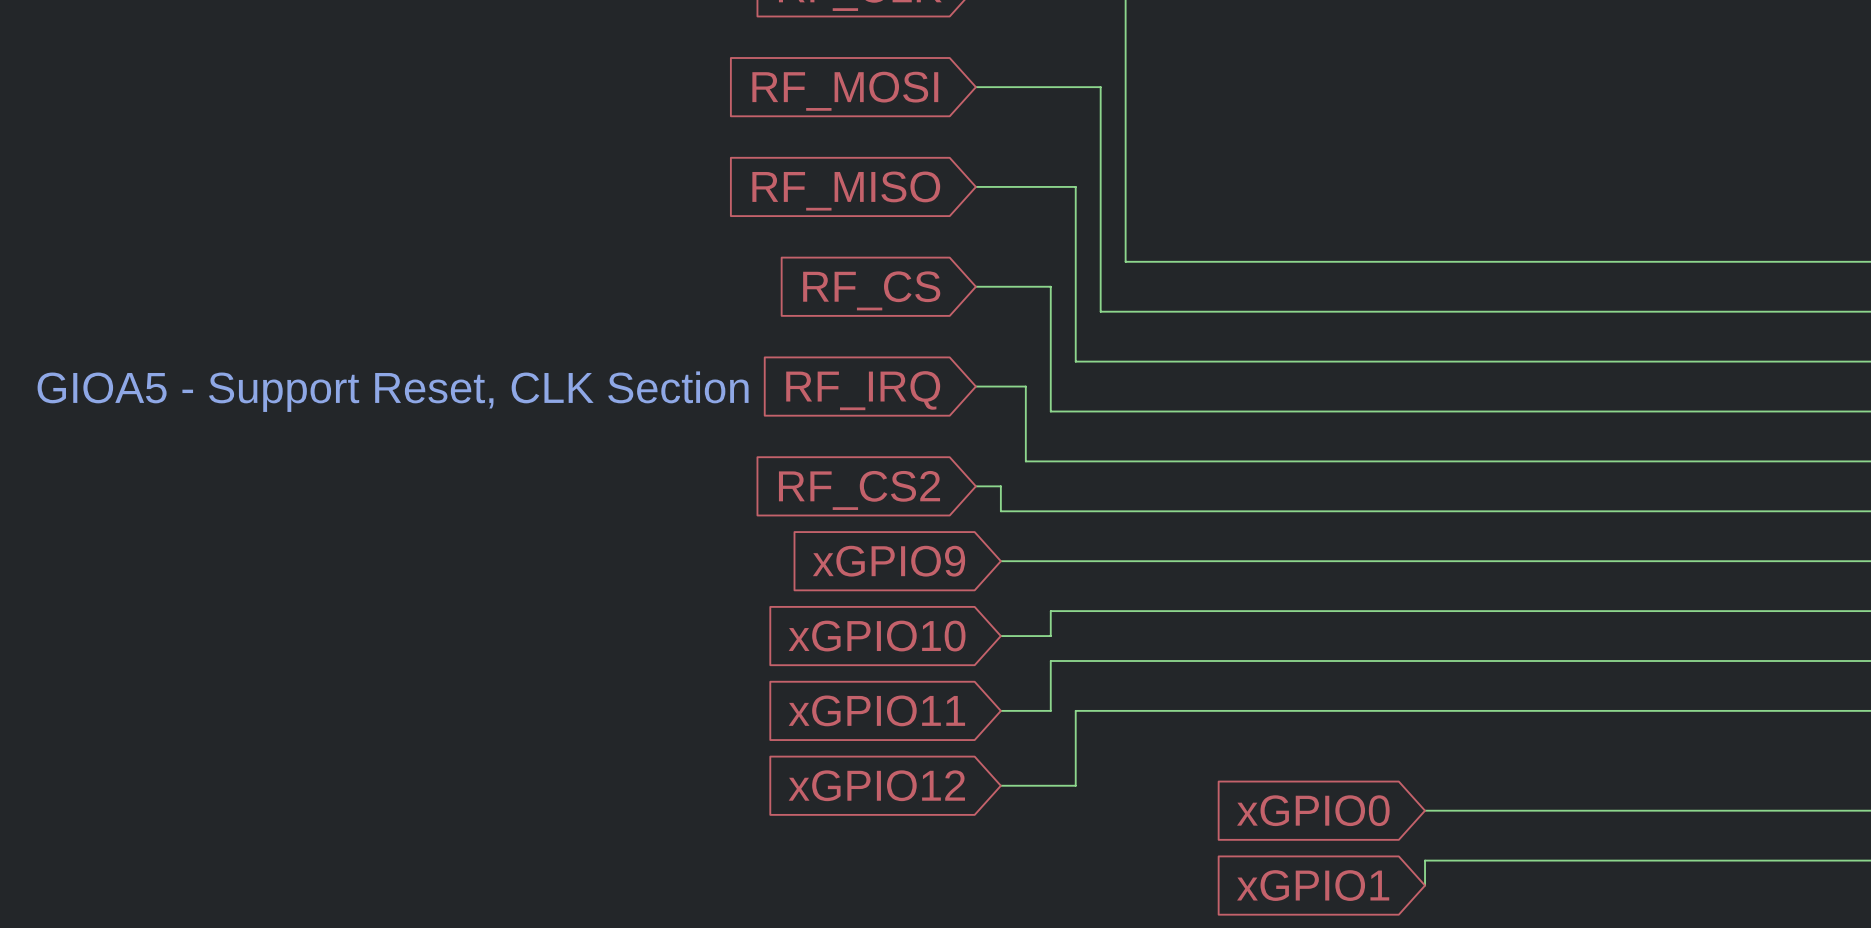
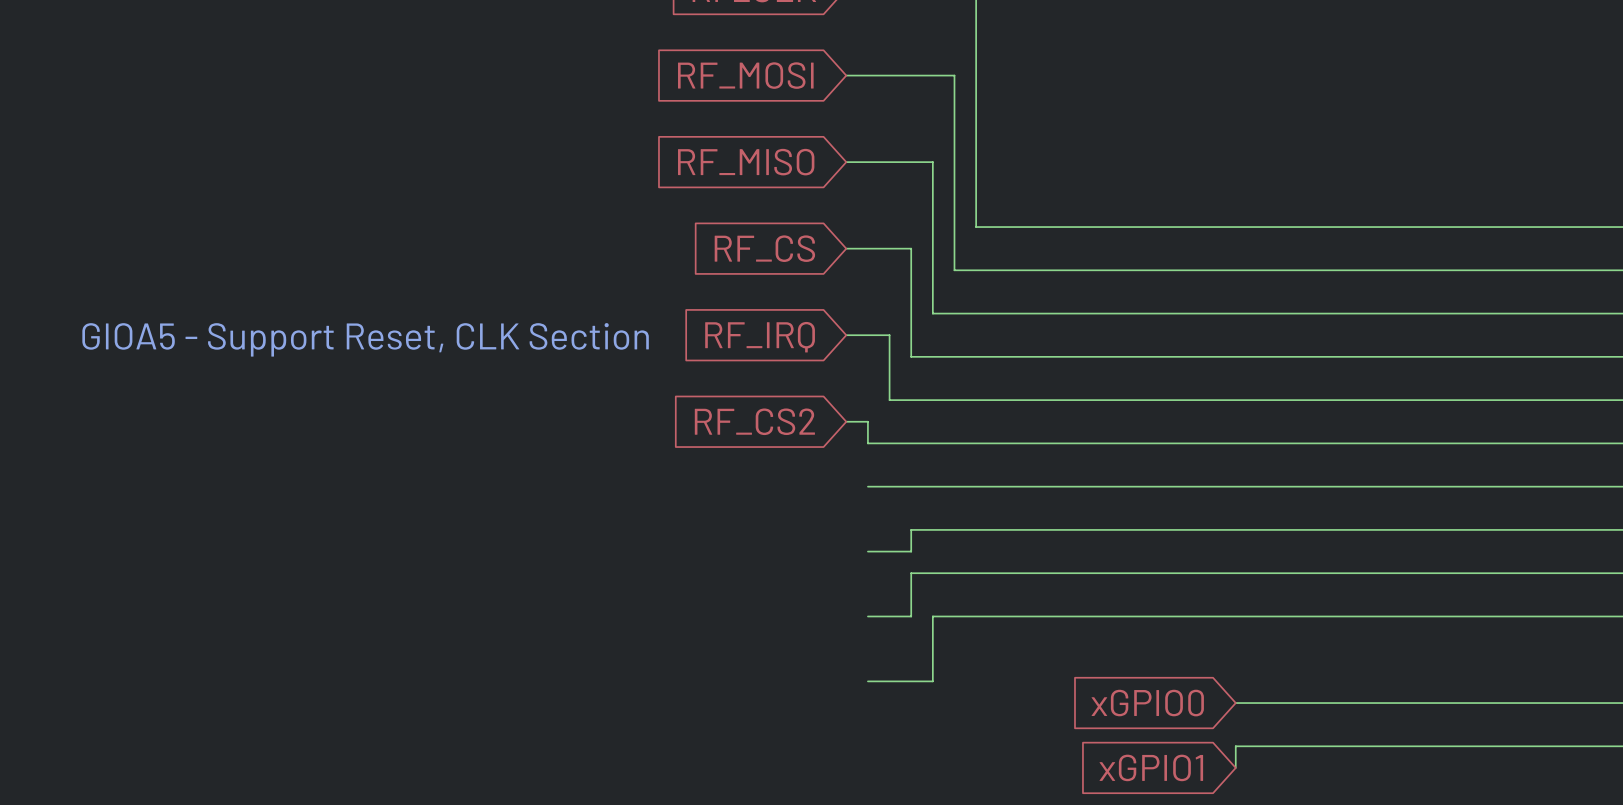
global label: xGPIO9 (889, 561) -> none
global label: xGPIO10 (877, 636) -> none
global label: xGPIO11 (876, 710) -> none
global label: xGPIO12 (876, 785) -> none

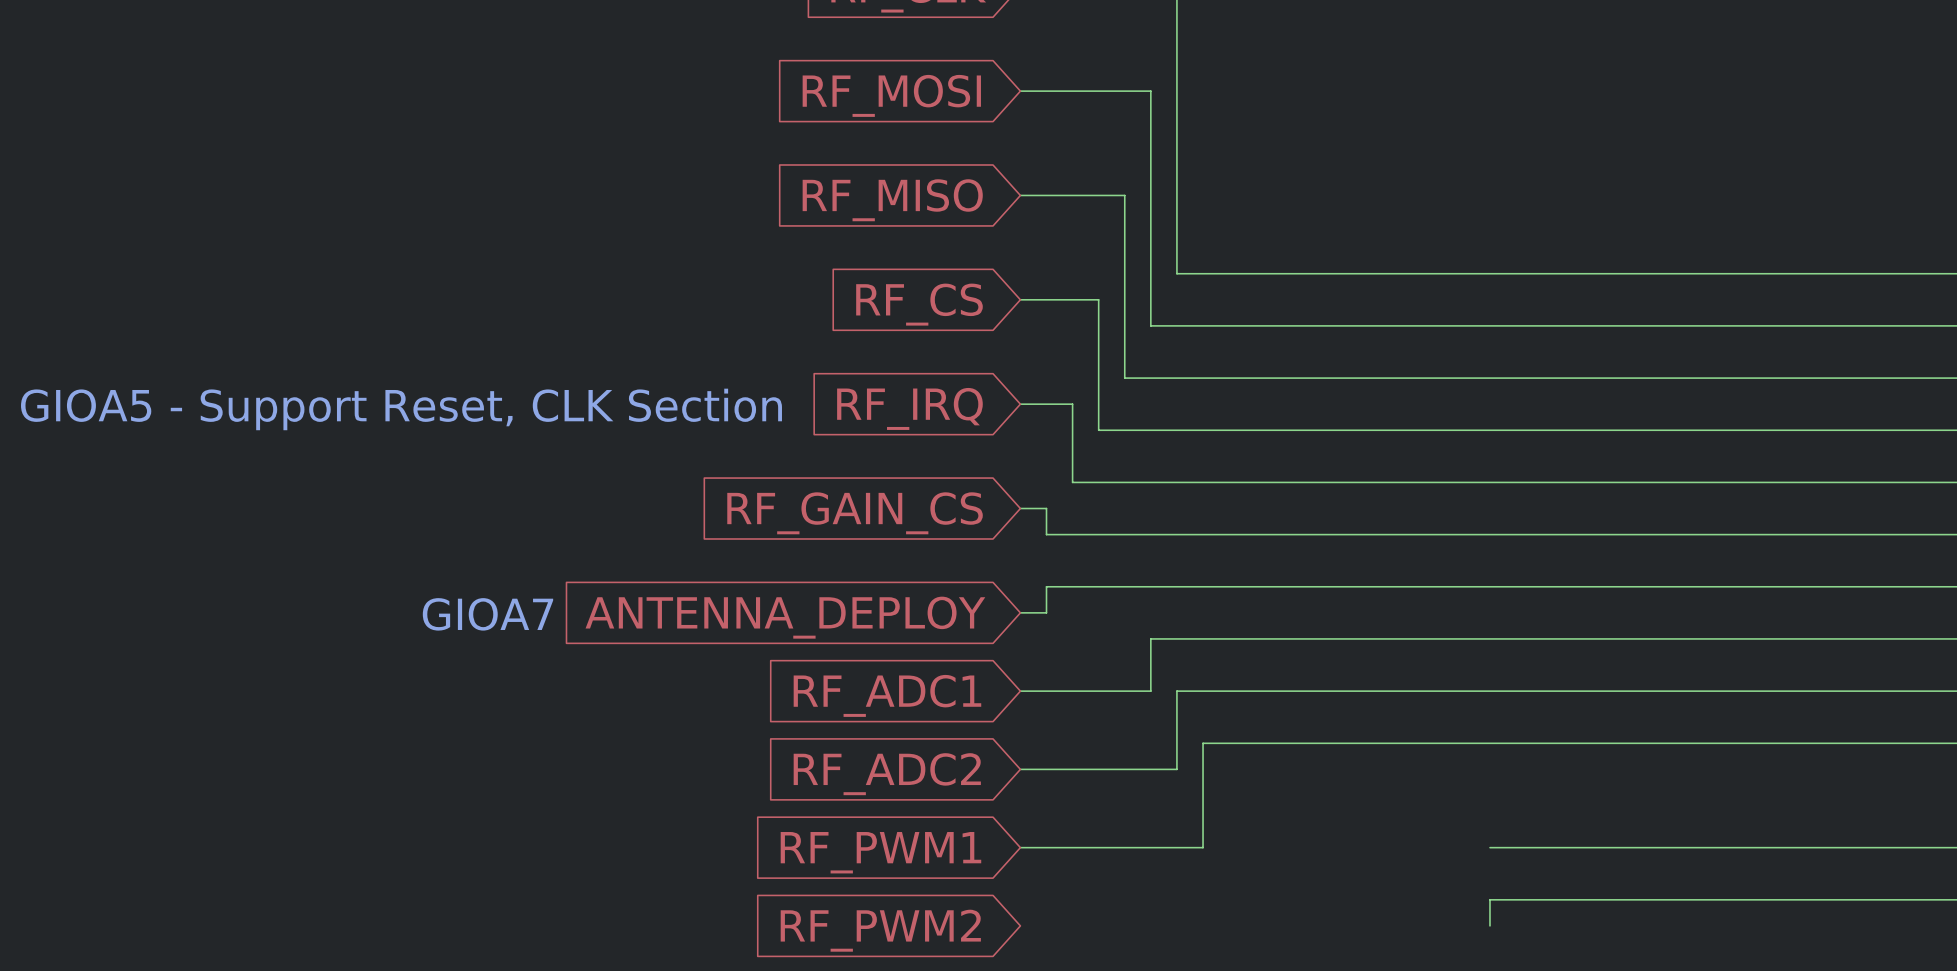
global label: RF_CS2 (754, 421) -> RF_GAIN_CS (855, 513)
wire: none -> (1046, 586) (1046, 612) (1020, 612)
global label: none -> ANTENNA_DEPLOY (785, 617)
text: none -> GIOA7 (487, 614)
wire: (954, 529) (911, 529) (911, 551) (867, 551) -> none
global label: none -> RF_ADC1 (887, 695)
wire: (911, 573) (911, 616) (867, 616) -> (1098, 691) (1020, 691)
wire: (954, 573) (976, 573) -> (1150, 691) (1150, 638)
wire: none -> (1176, 691) (1176, 769) (1020, 769)
wire: (997, 616) (932, 616) (932, 681) (867, 681) -> (1203, 743) (1203, 847) (1020, 847)
global label: none -> RF_ADC2 (887, 774)
global label: none -> RF_PWM1 (880, 852)
global label: xGPIO0 (1147, 703) -> none
global label: none -> RF_PWM2 (880, 930)
global label: xGPIO1 (1151, 767) -> none

